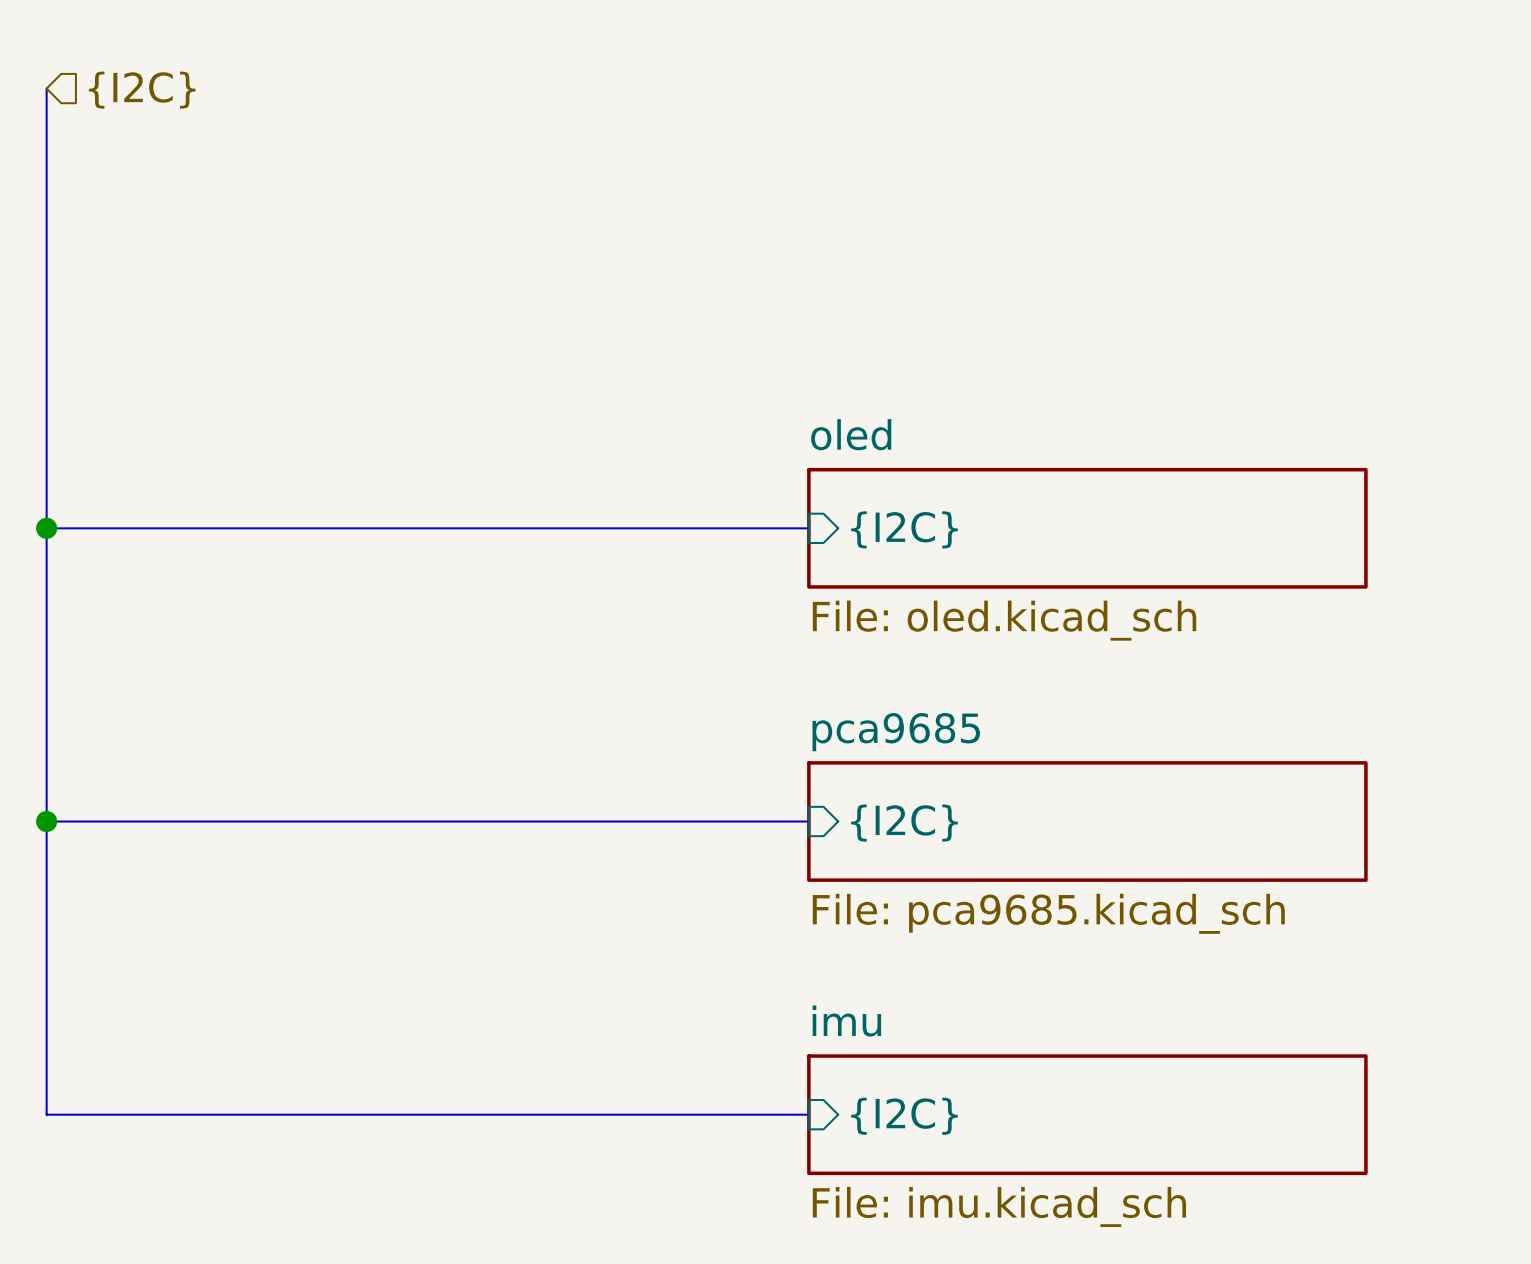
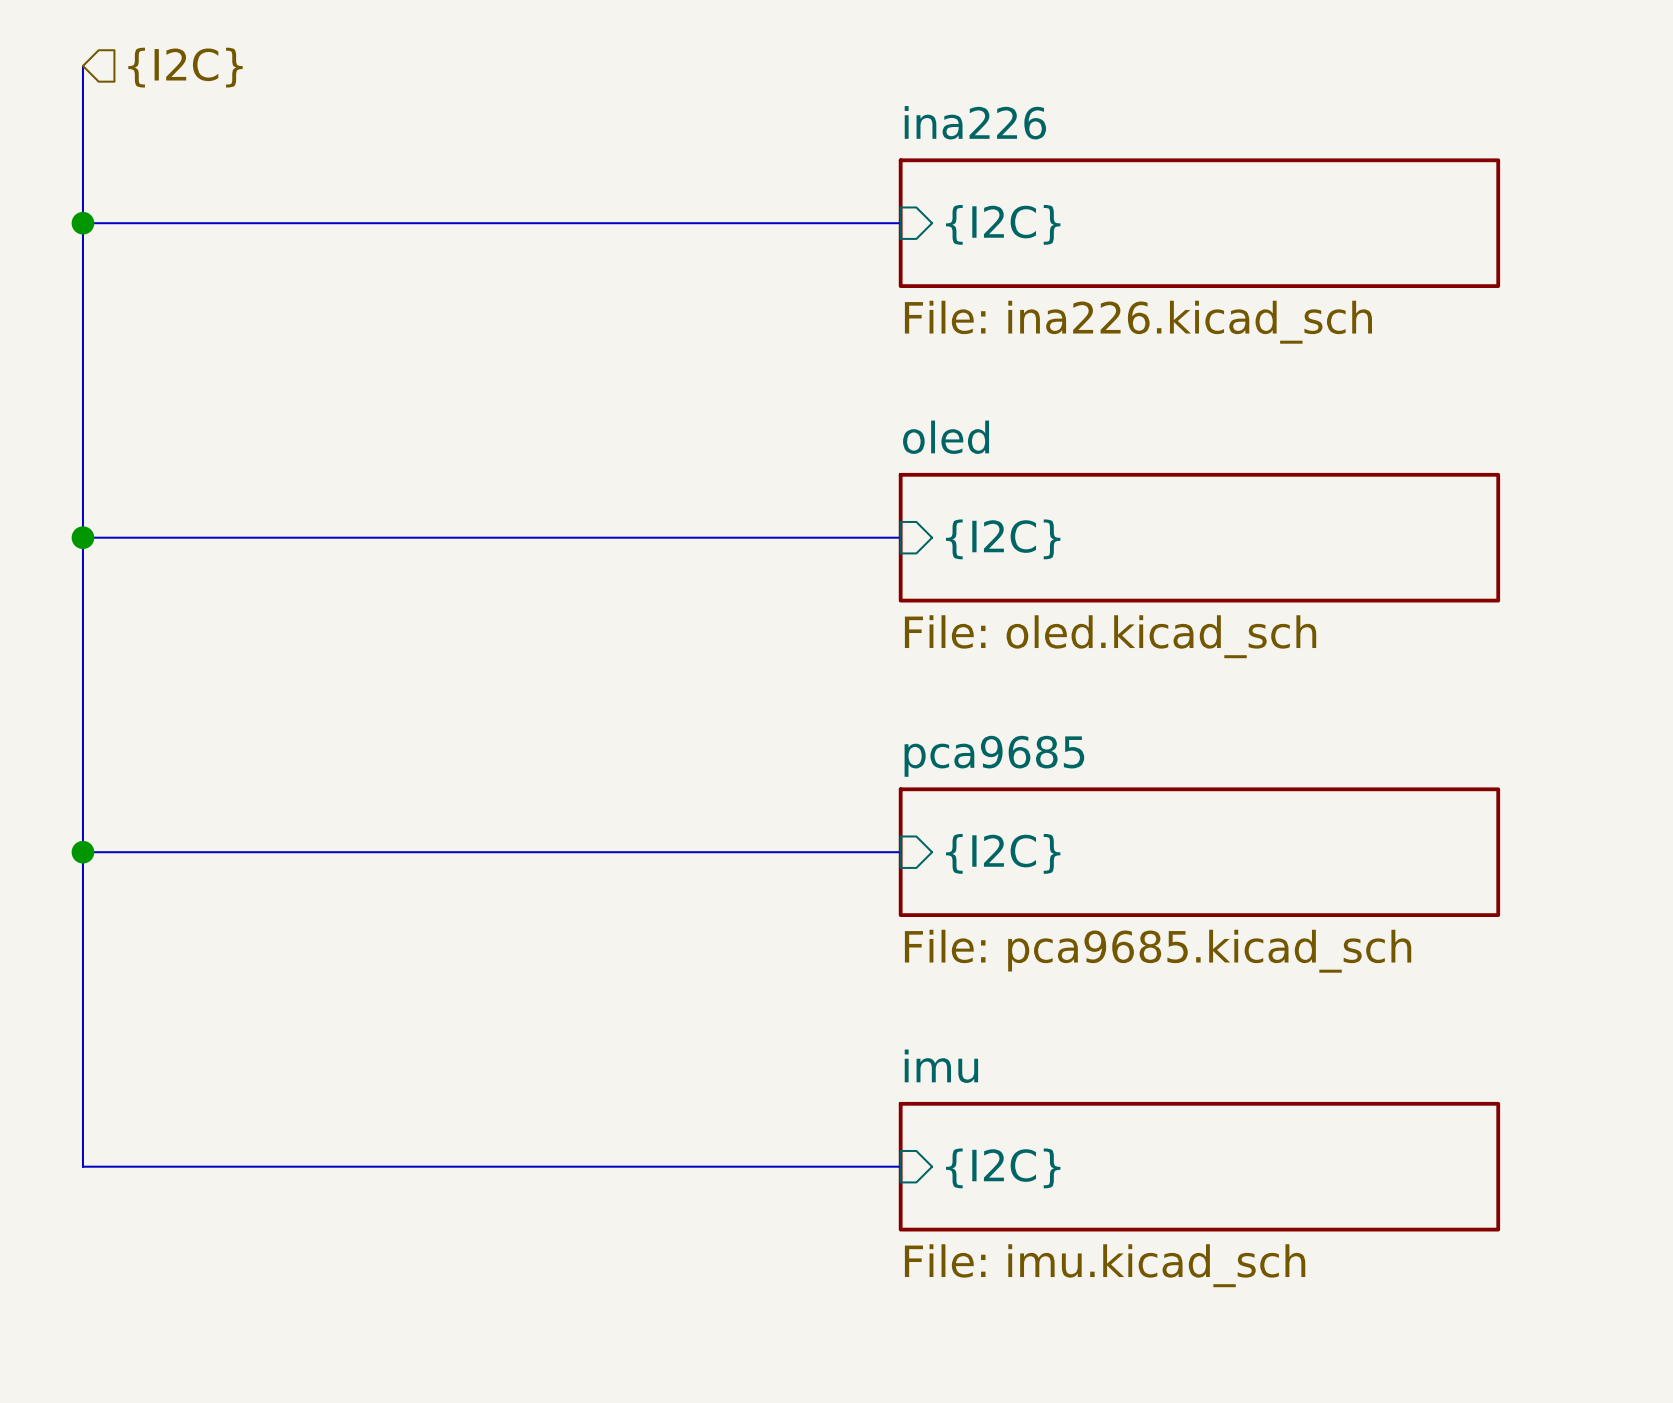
bus: none -> (82, 223) (900, 223)
junction: none -> (82, 223)
sheet ina226: none -> File: ina226.kicad_sch (1199, 223)
sheet pin: none -> {I2C} (1003, 224)

